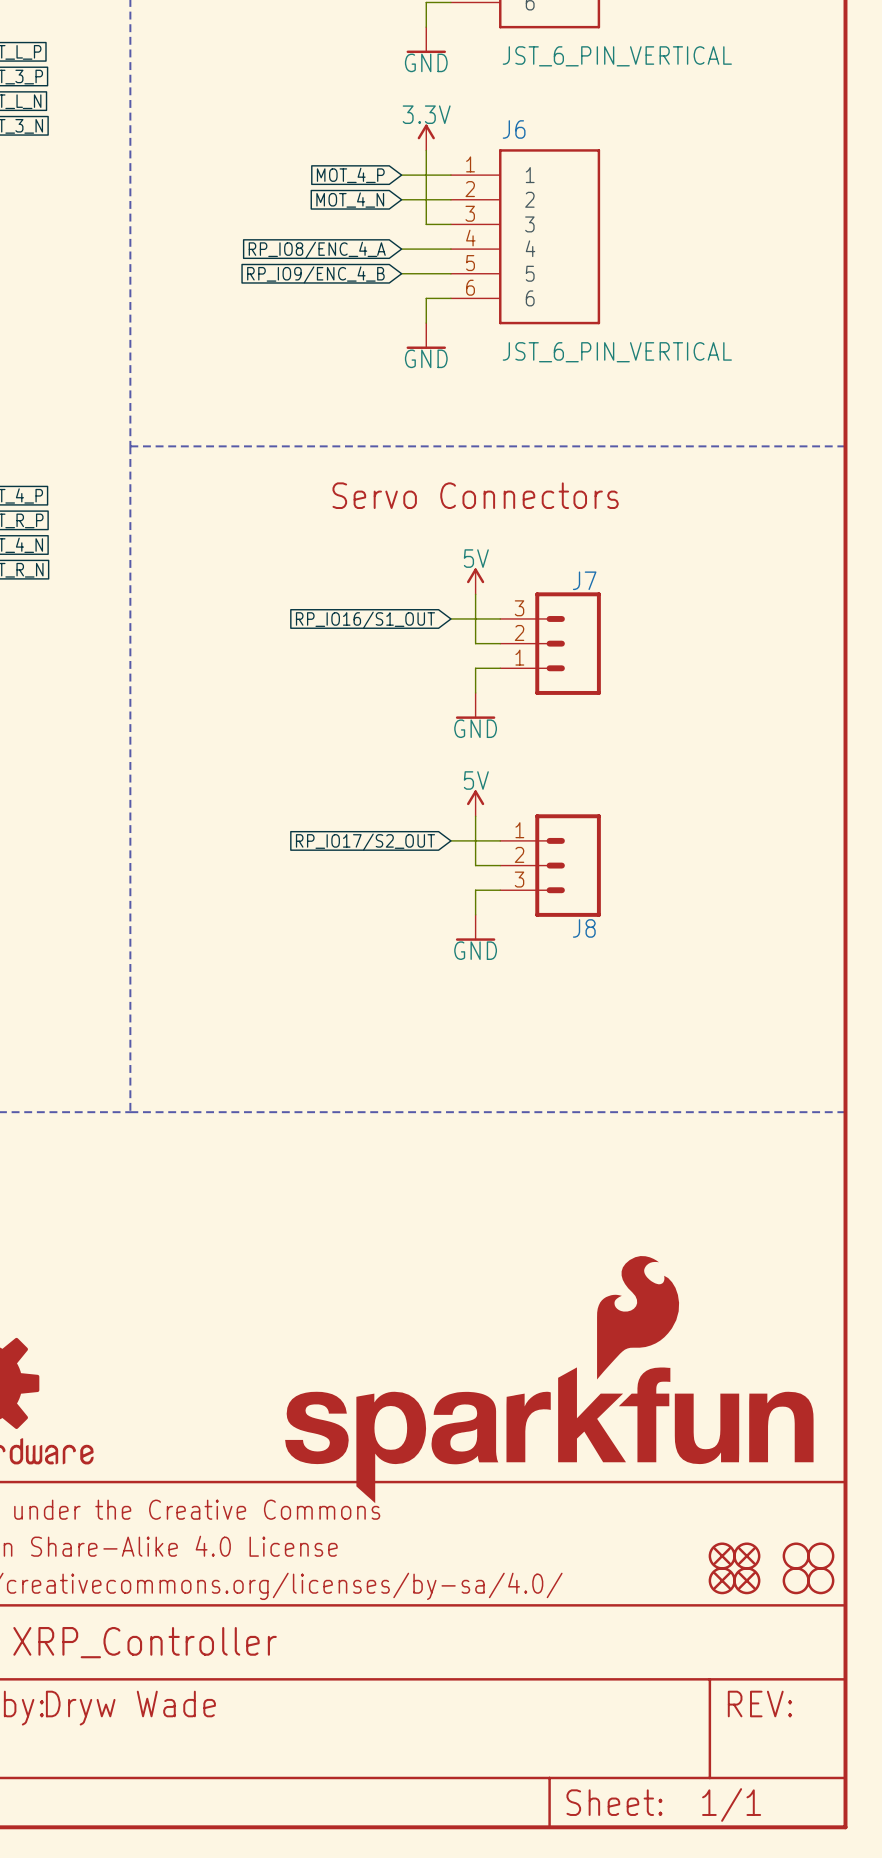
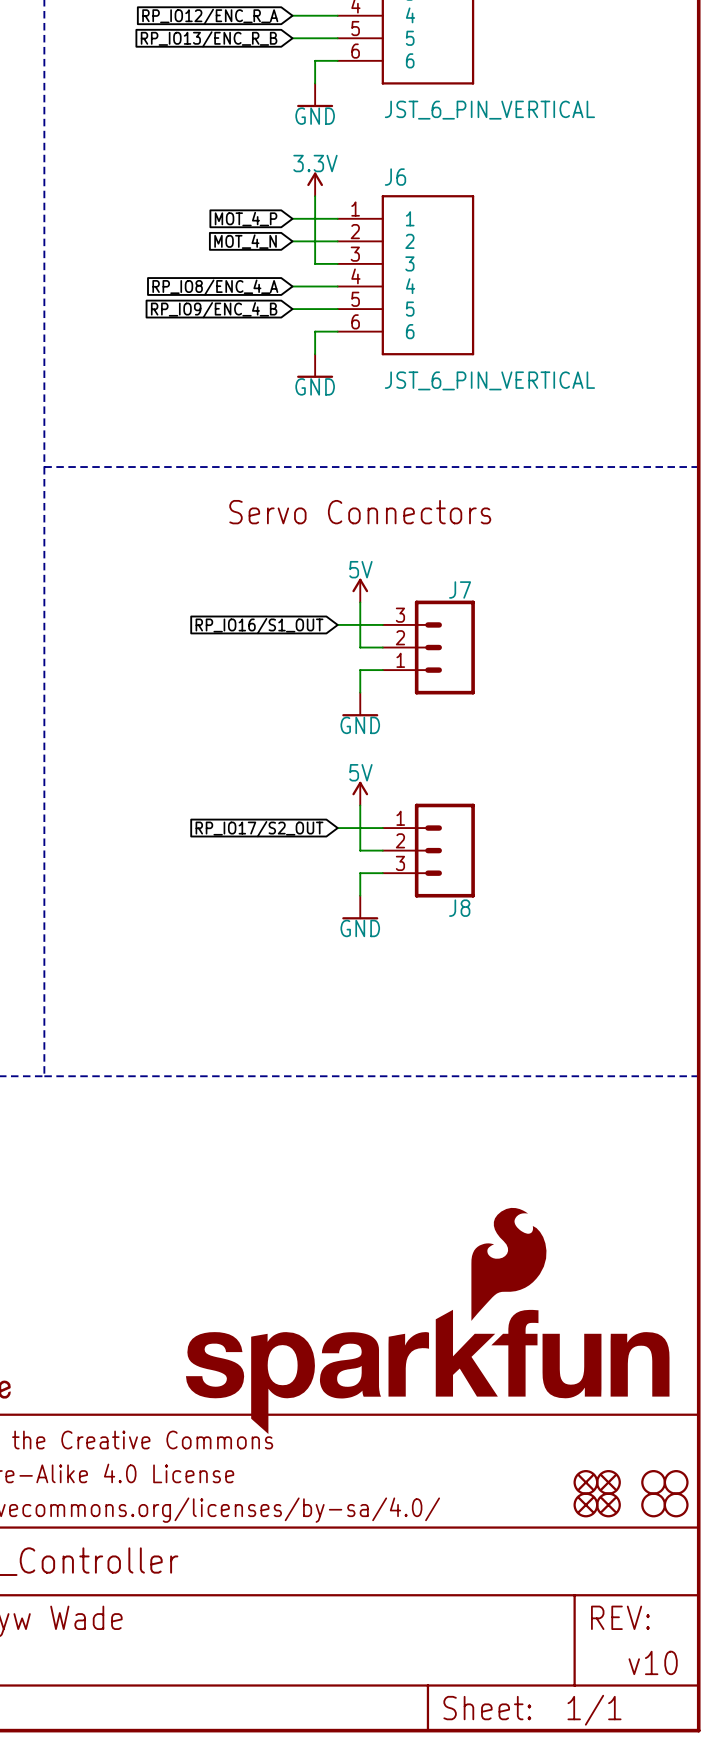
text: none -> v10 (653, 1662)

